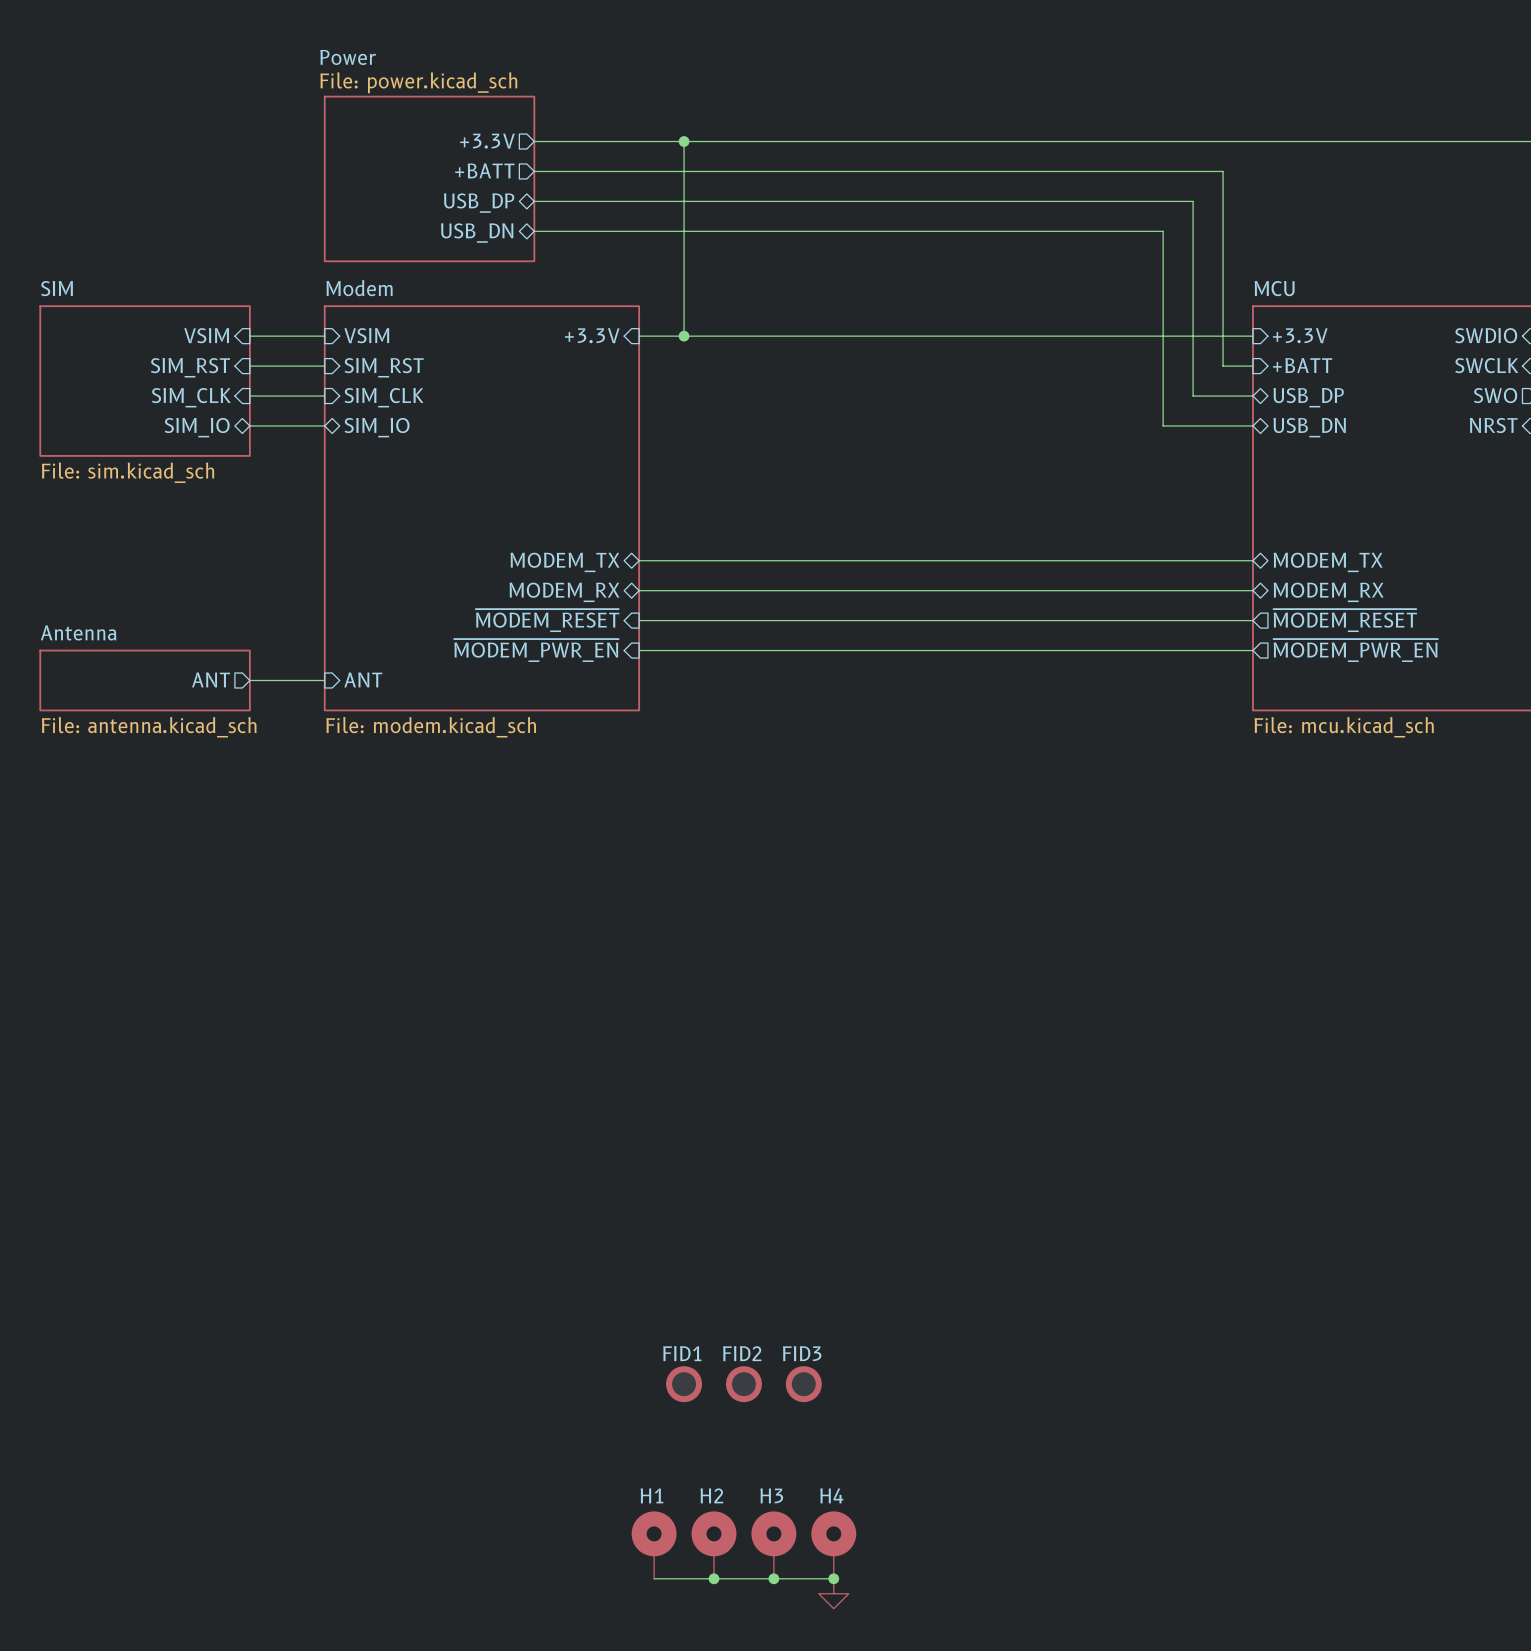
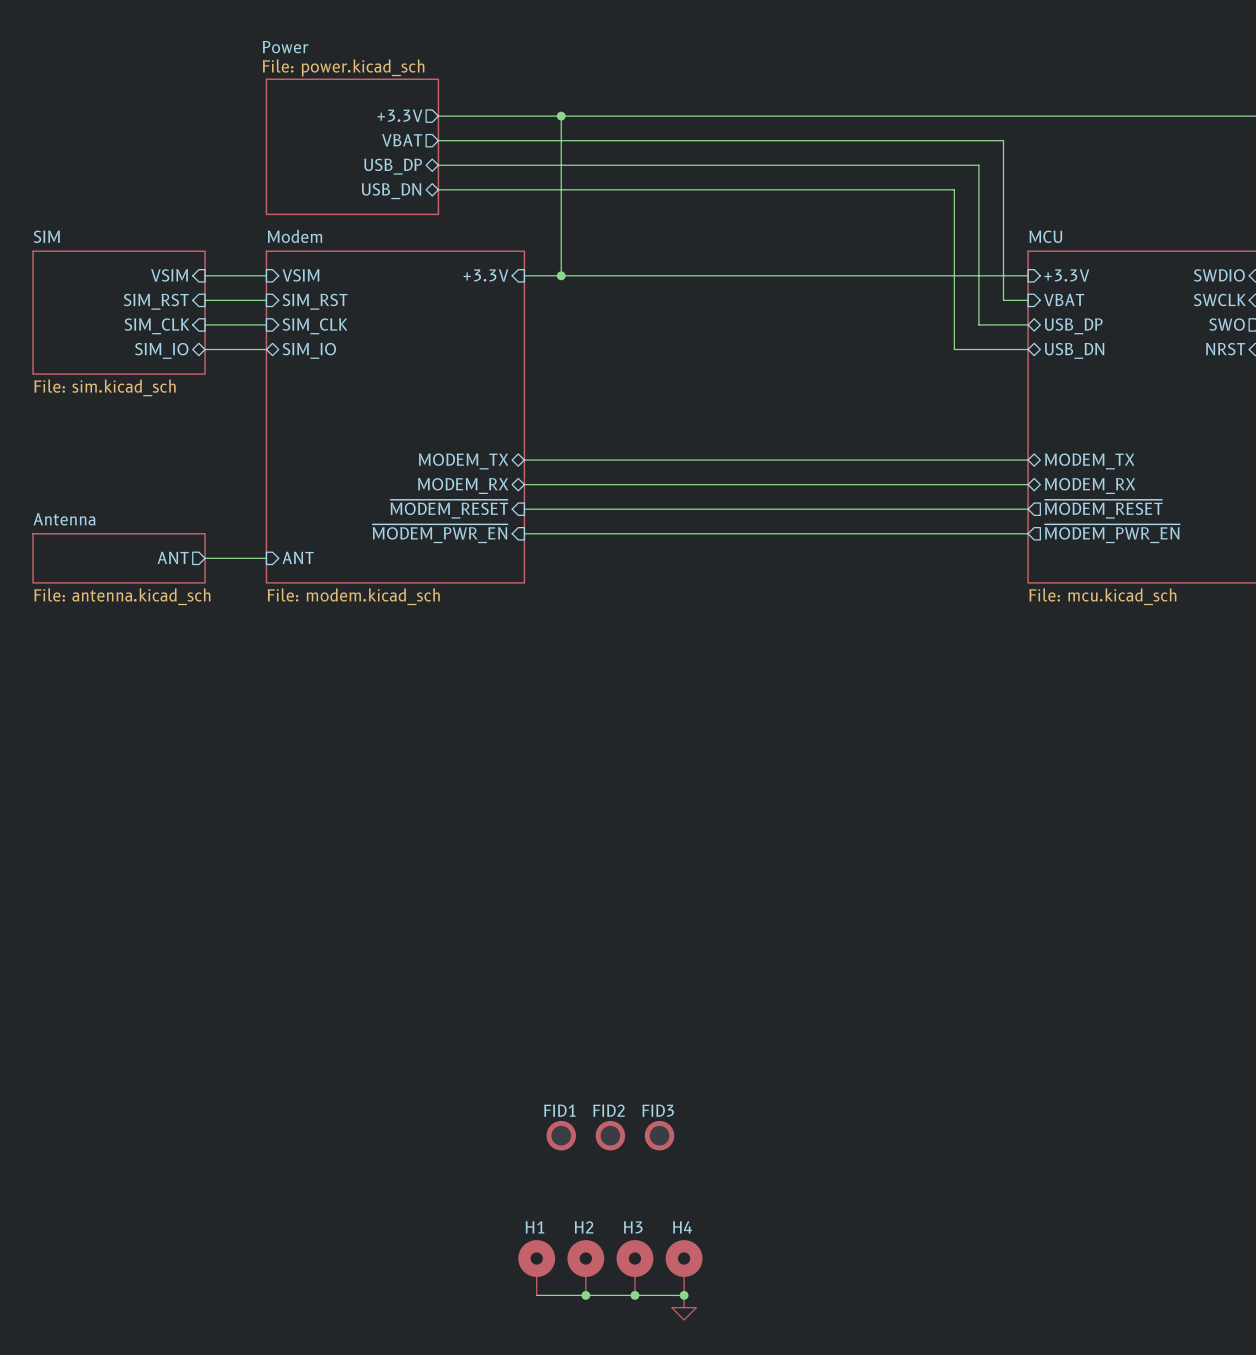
sheet pin: +BATT (484, 170) -> VBAT (402, 140)
sheet pin: +BATT (1302, 365) -> VBAT (1064, 300)

